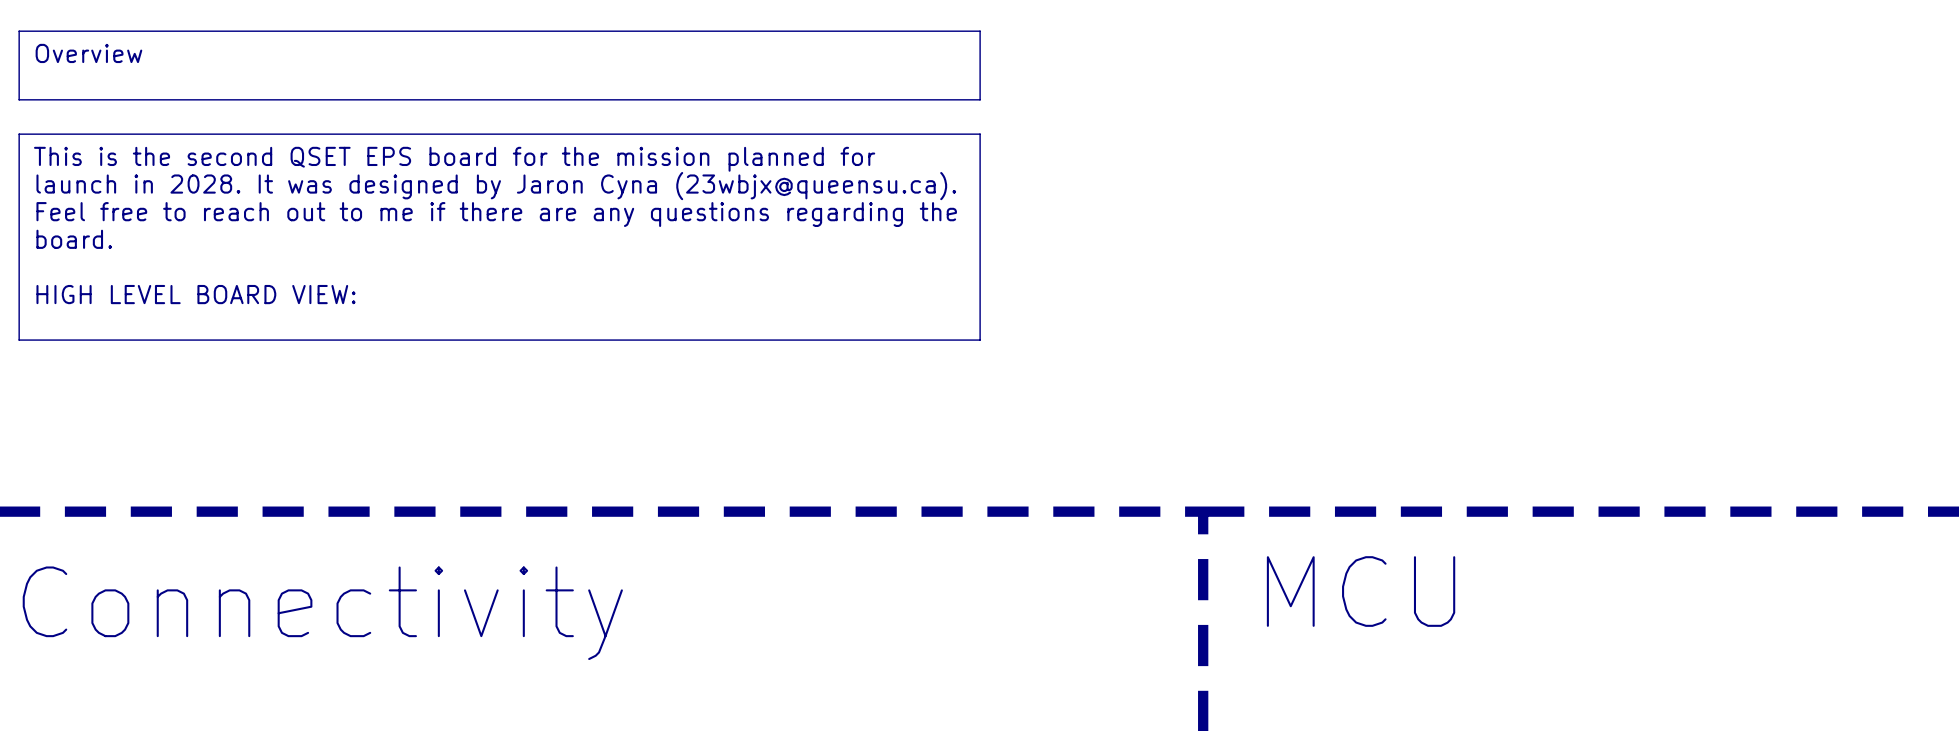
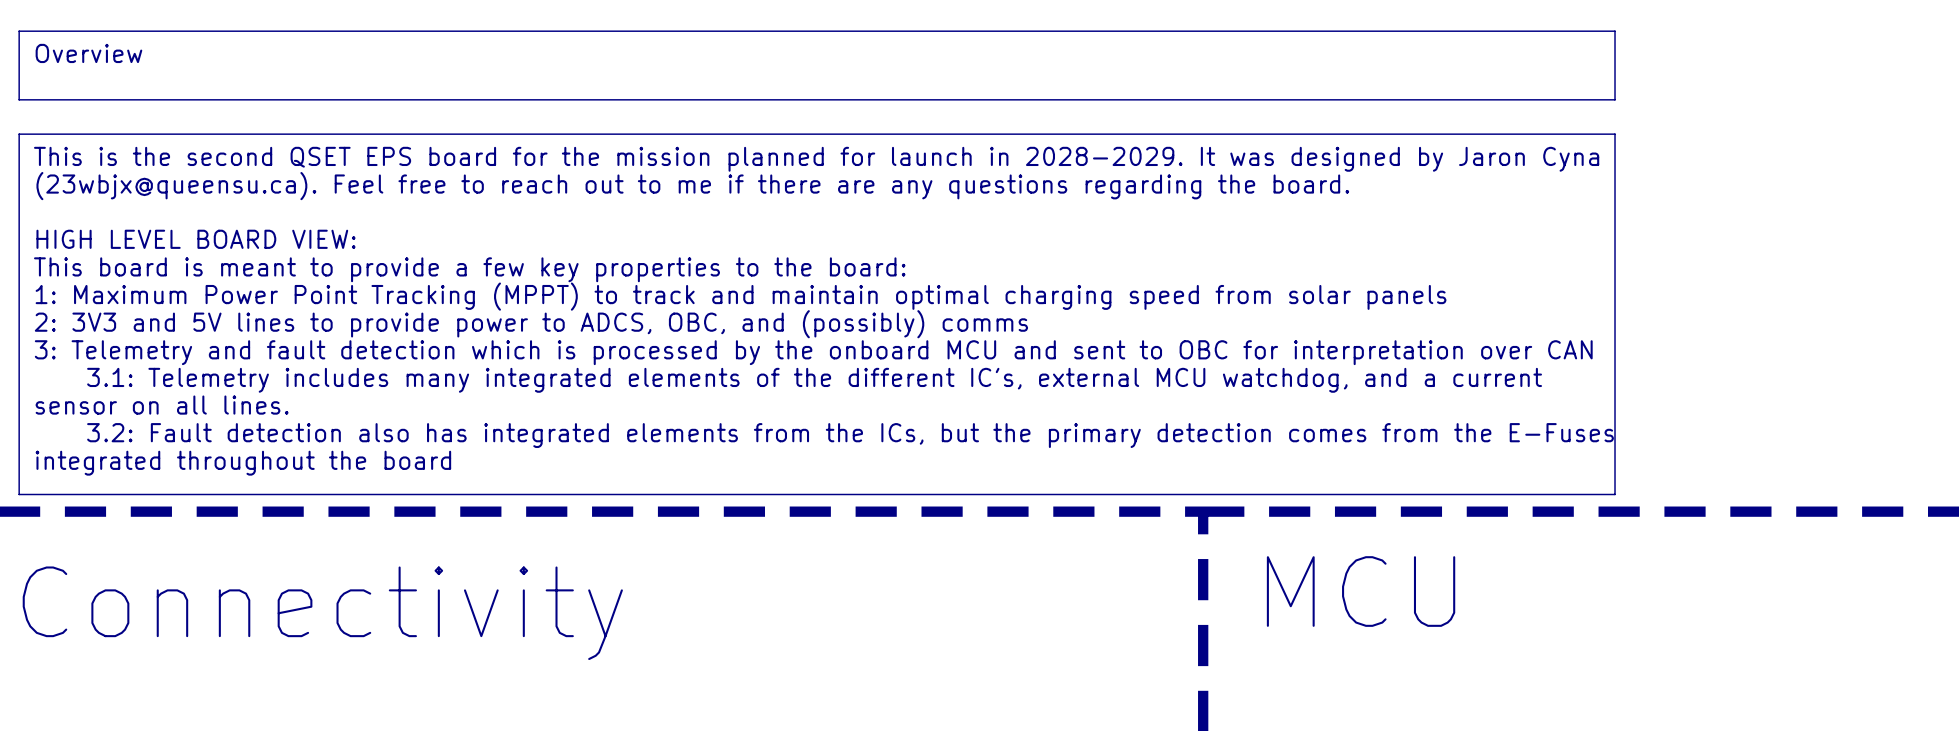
line: (980, 31) (980, 99) -> (980, 31) (1615, 31) (1615, 99) (980, 99)
line: (980, 134) (980, 340) (19, 340) -> (980, 134) (1615, 134) (1615, 494) (19, 494) (19, 340)
text: This is the second QSET EPS board for the mission planned for (454, 159) -> This is the second QSET EPS board for the mission planned for launch in 2028-2029. It was designed by Jaron Cyna (816, 159)
text: launch in 2028. It was designed by Jaron Cyna (23wbjx@queensu.ca). (496, 186) -> (23wbjx@queensu.ca). Feel free to reach out to me if there are any questions regarding the board. (692, 186)
text: Feel free to reach out to me if there are any questions regarding the (496, 214) -> none
text: board. (74, 239) -> HIGH LEVEL BOARD VIEW: (195, 239)
text: none -> This board is meant to provide a few key properties to the board: (469, 269)
text: HIGH LEVEL BOARD VIEW: (195, 294) -> 1: Maximum Power Point Tracking (MPPT) to track and maintain optimal charging speed from solar panels (741, 296)
text: none -> 2: 3V3 and 5V lines to provide power to ADCS, OBC, and (possibly) comms (531, 324)
text: none -> 3: Telemetry and fault detection which is processed by the onboard MCU and sent to OBC for interpretation over CAN (813, 352)
text: none -> 3.1: Telemetry includes many integrated elements of the different IC's, external MCU watchdog, and a current (814, 380)
text: none -> sensor on all lines. (162, 405)
text: none -> 3.2: Fault detection also has integrated elements from the ICs, but the primary detection comes from the E-Fuses (850, 435)
text: none -> integrated throughout the board (243, 463)

